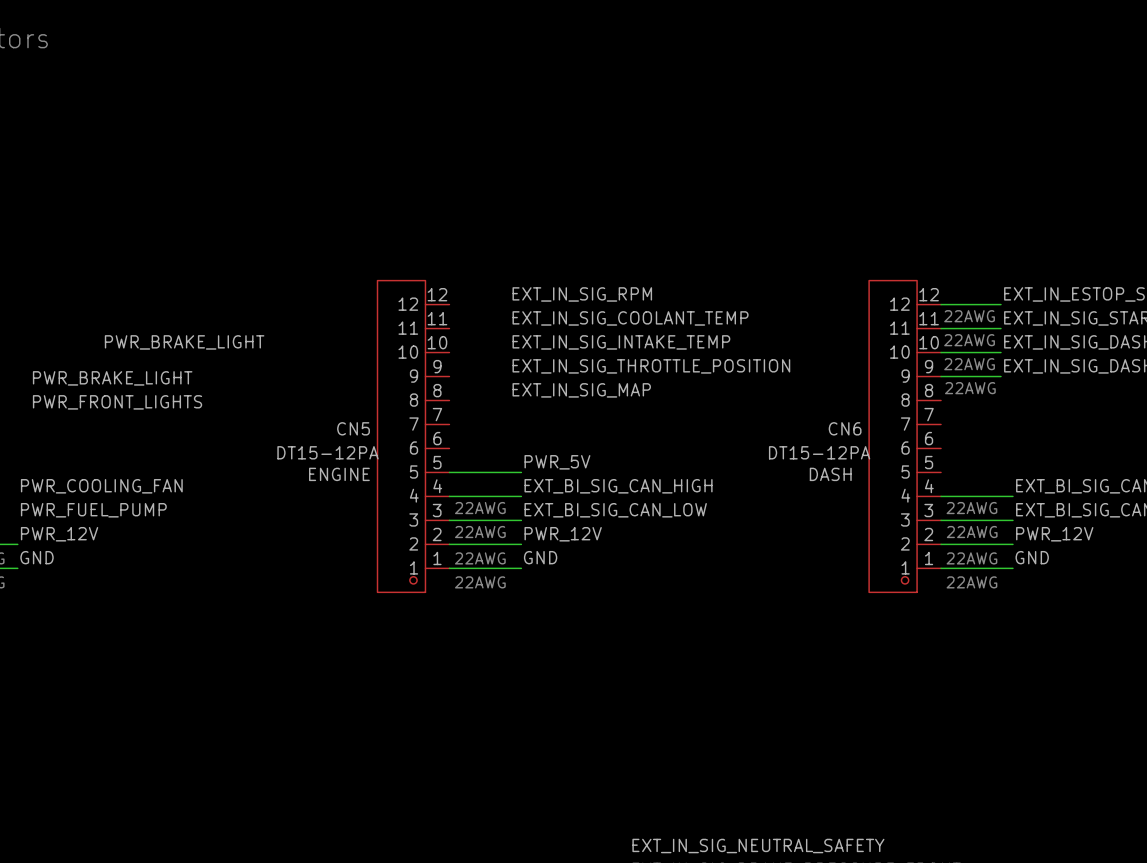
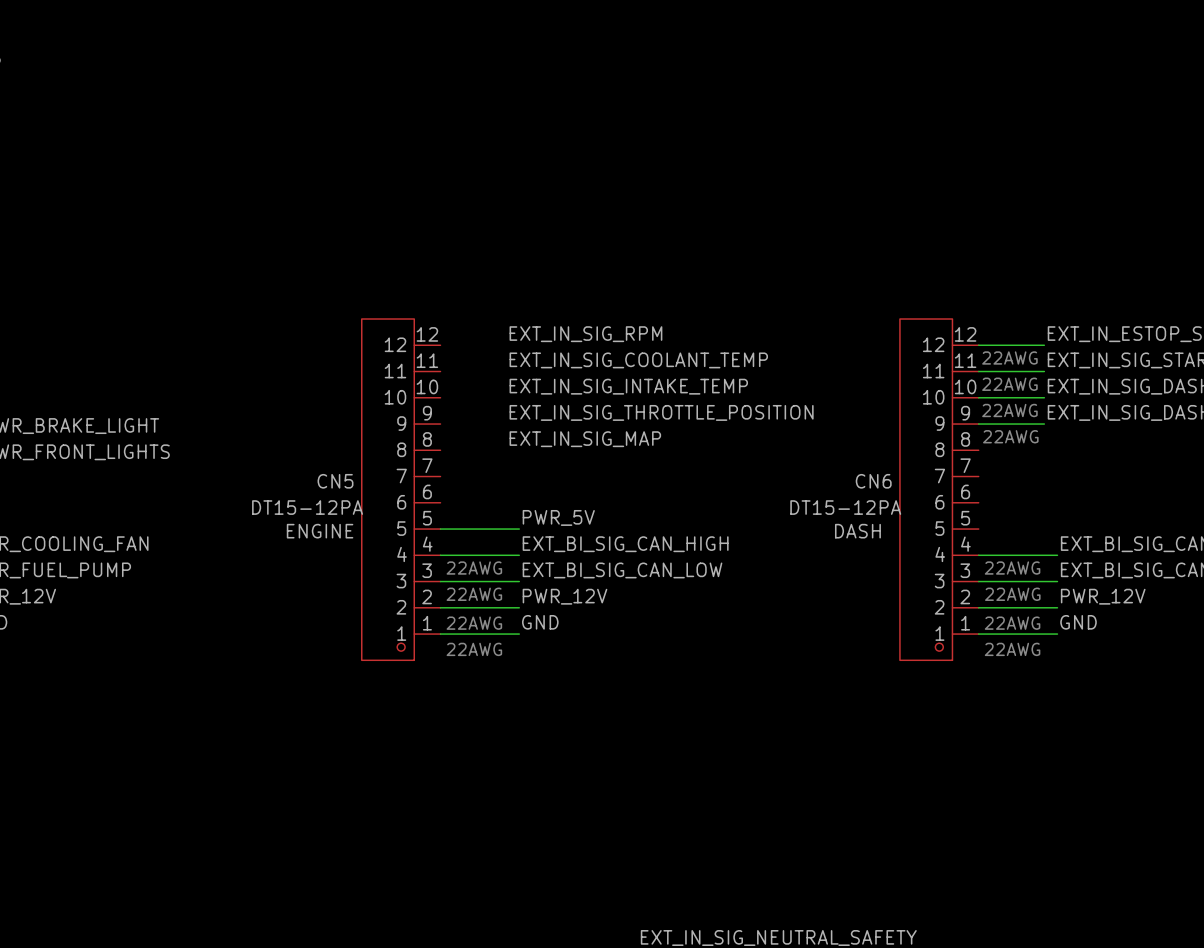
label: PWR_BRAKE_LIGHT (184, 342) -> none

